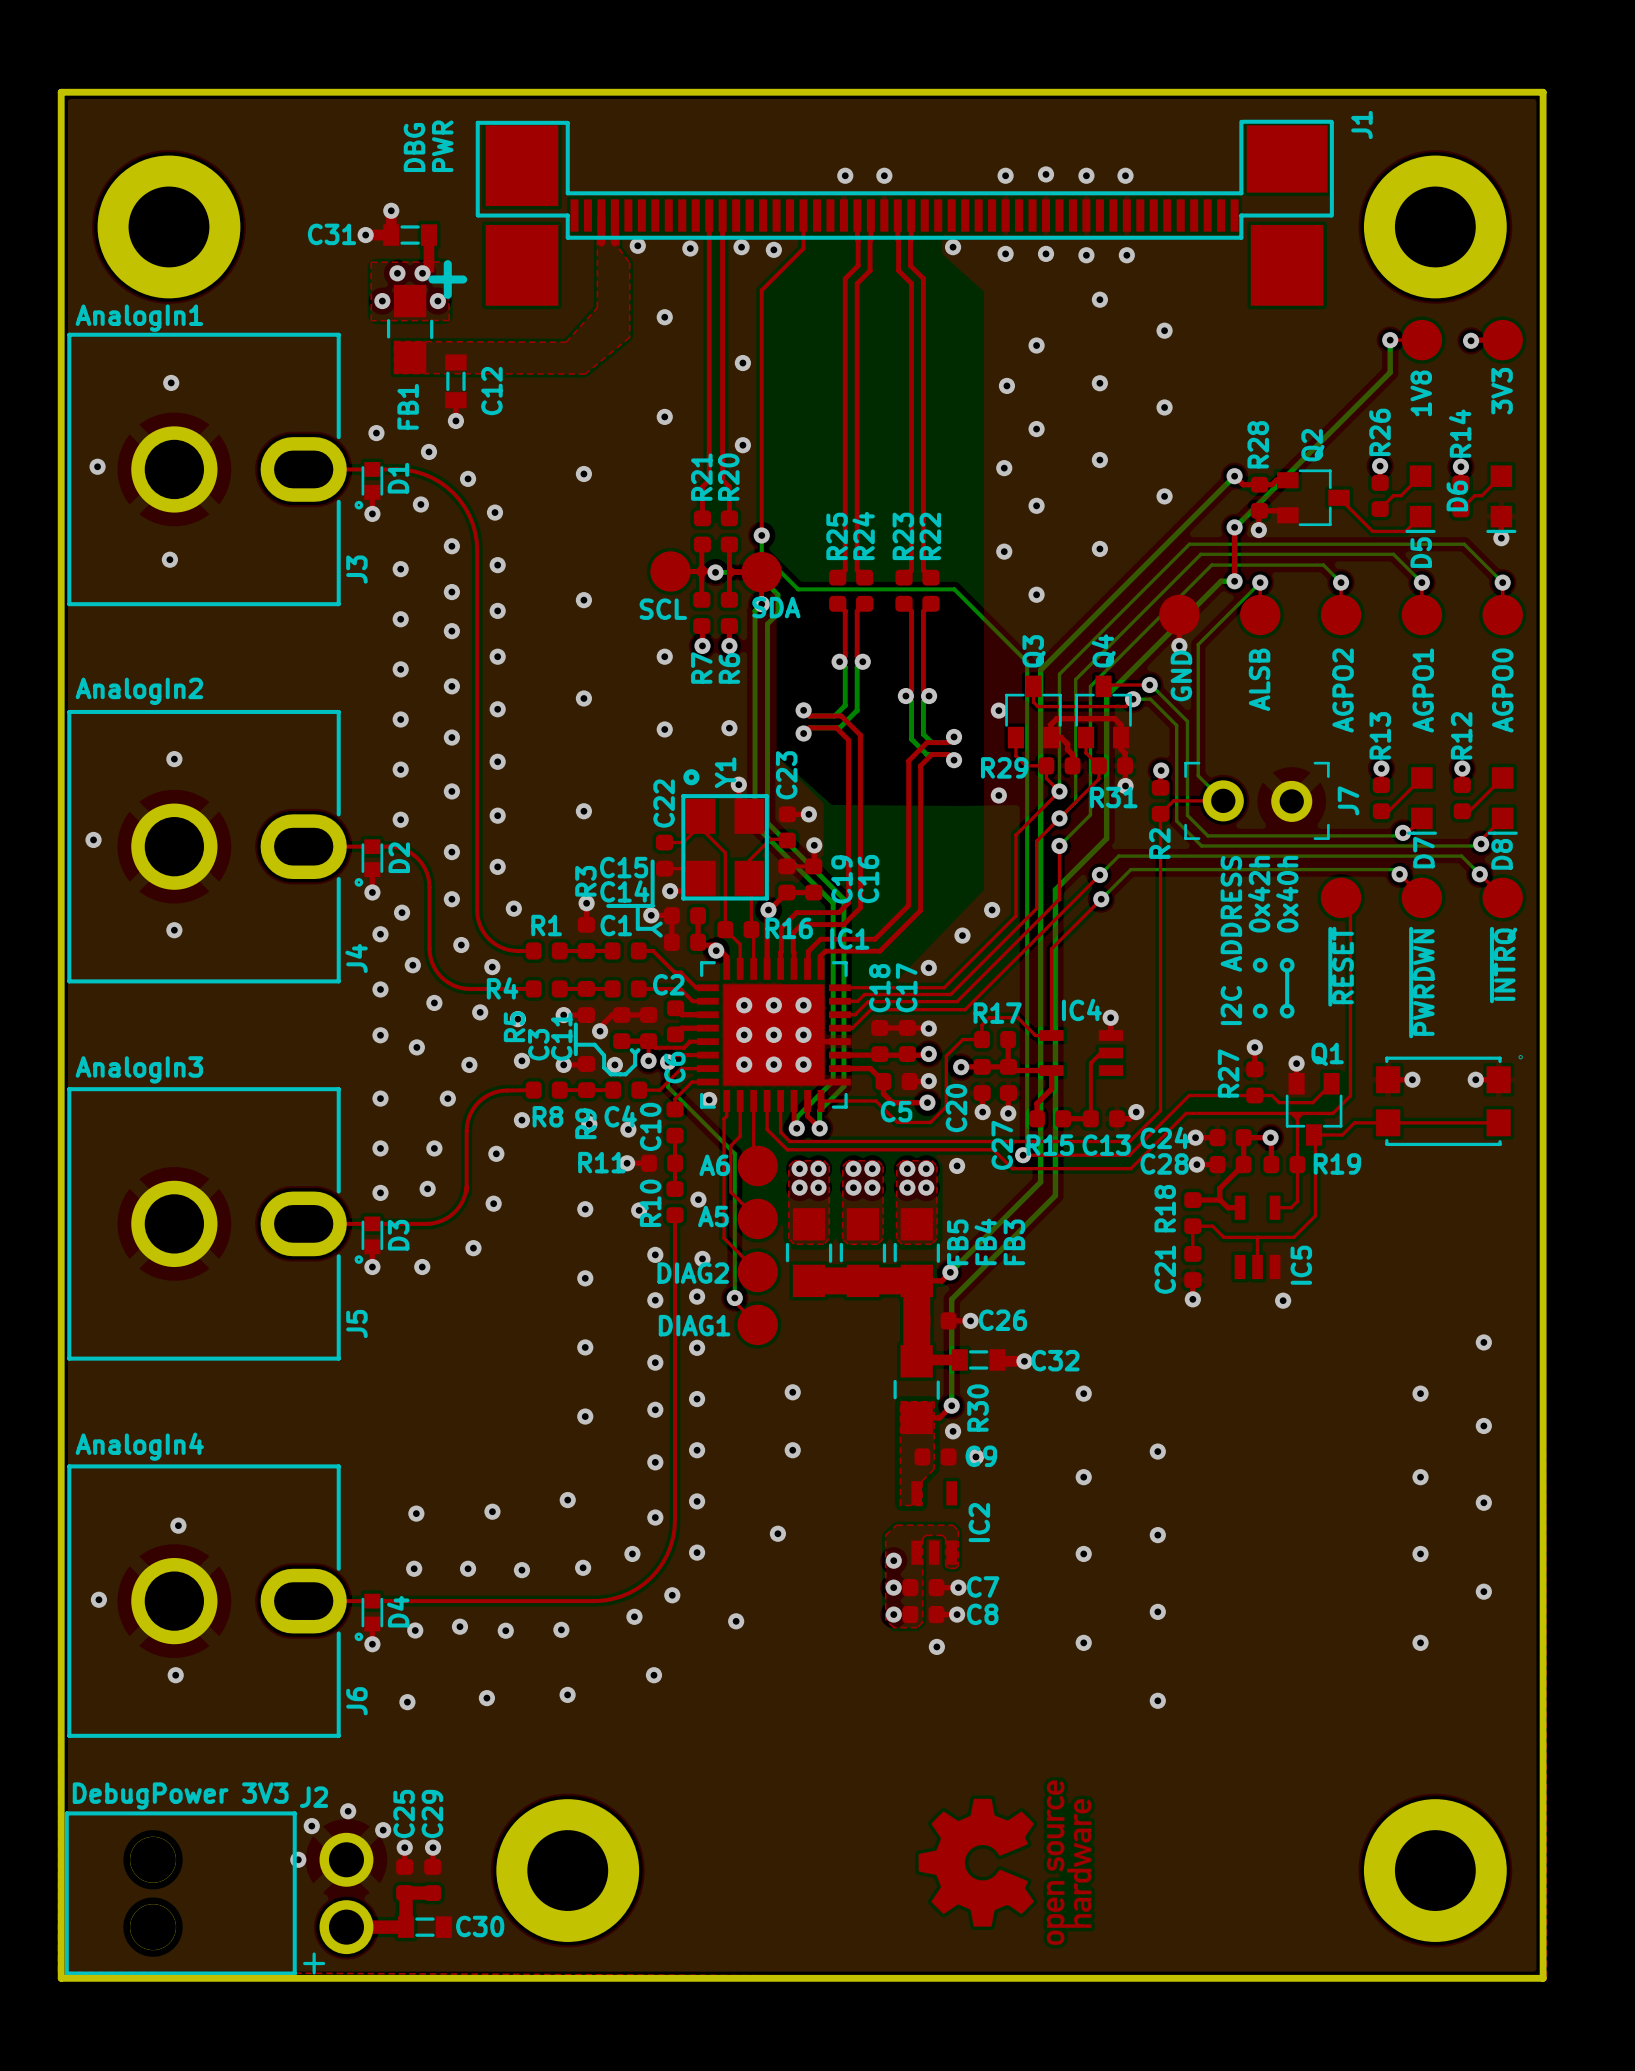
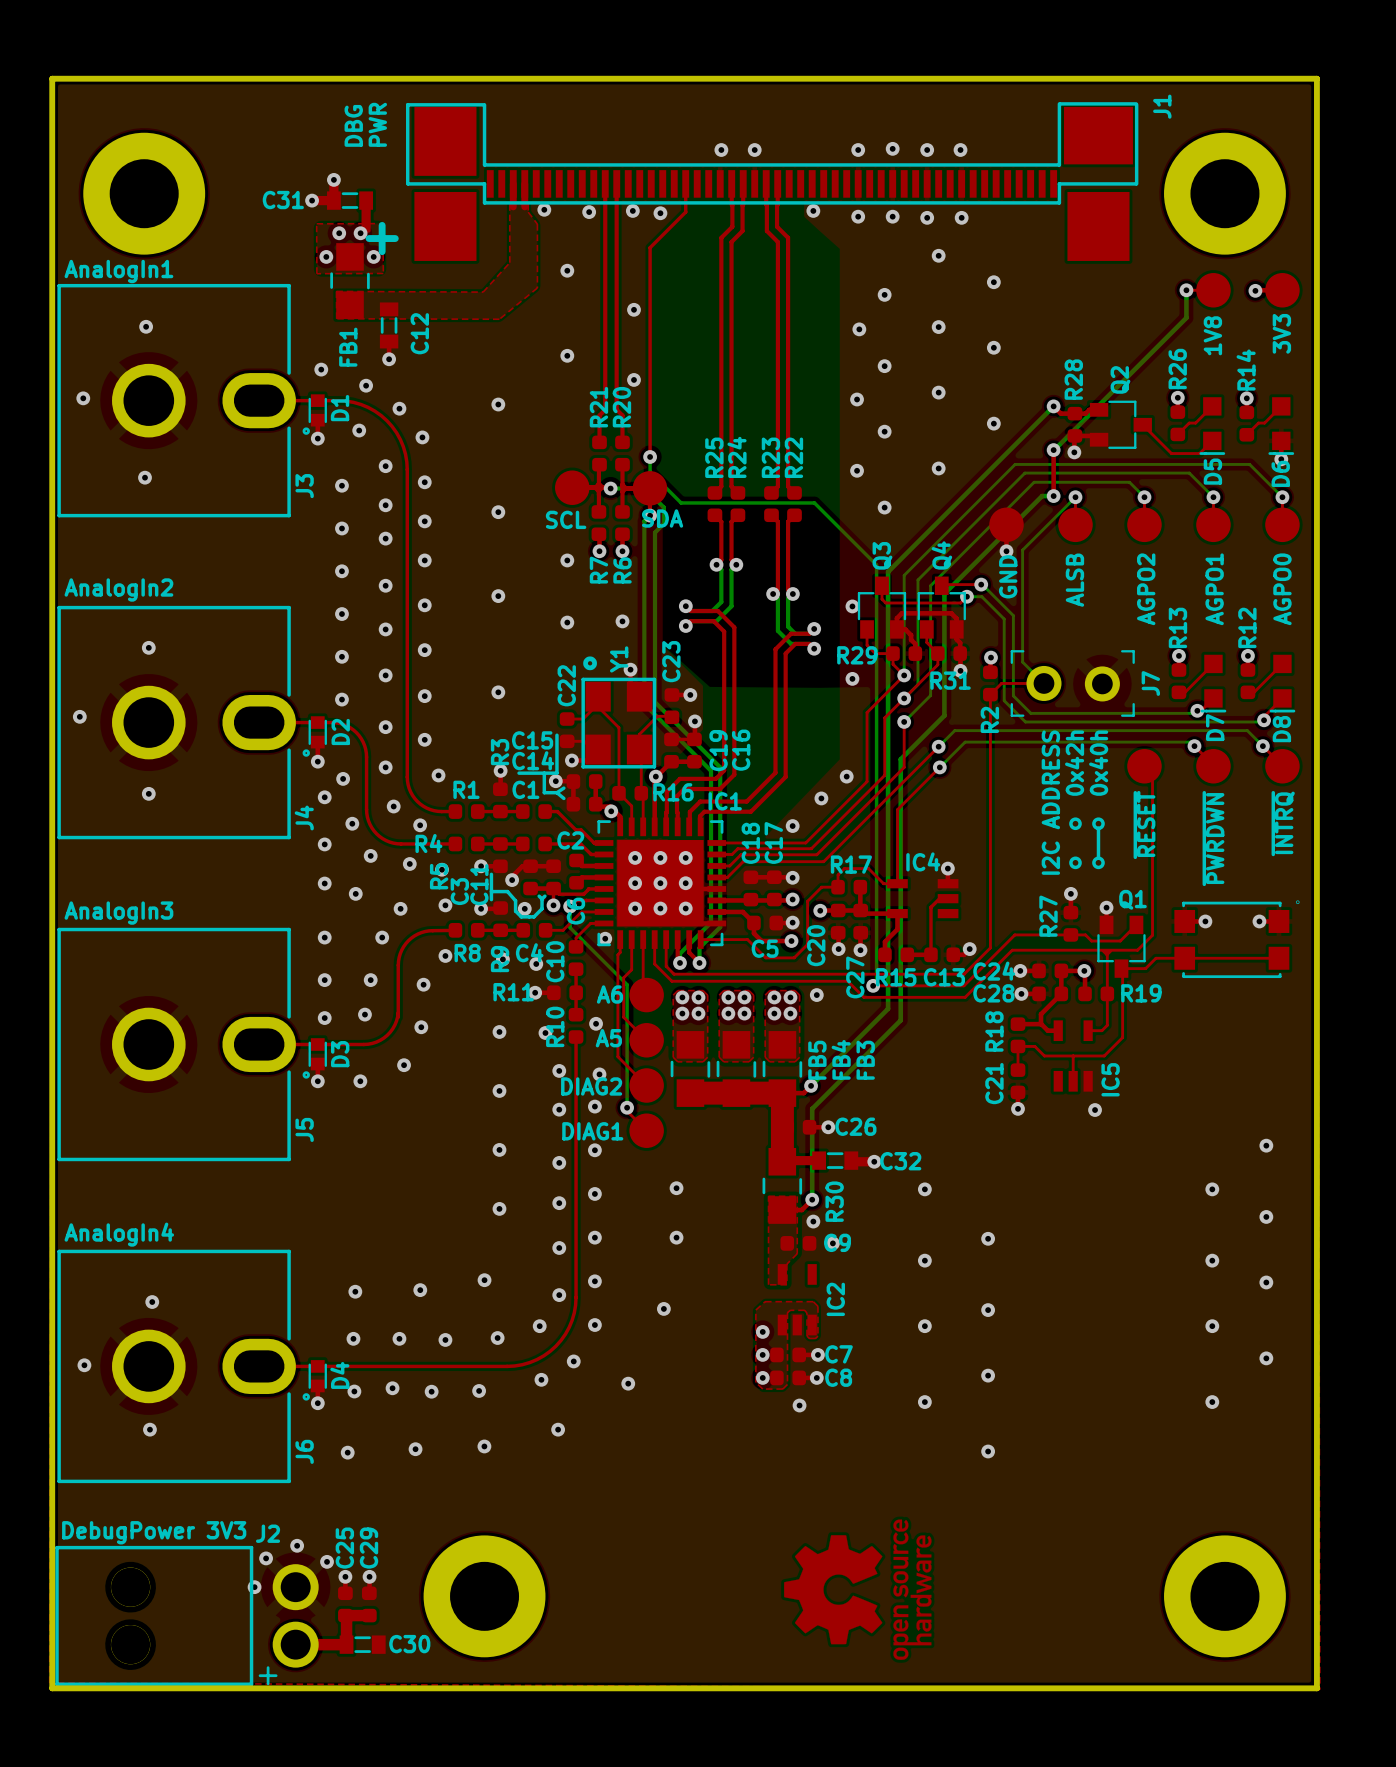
D6 name position: D6 (1457, 495) -> D6 (1280, 473)

